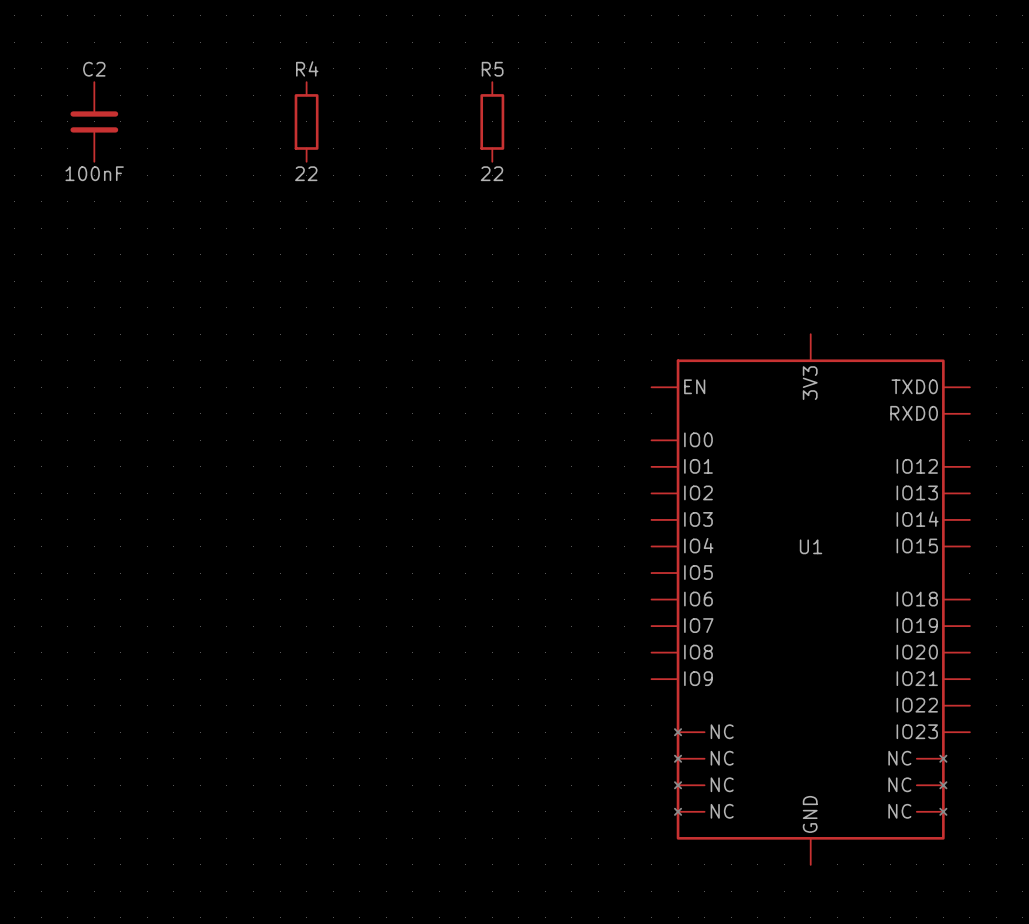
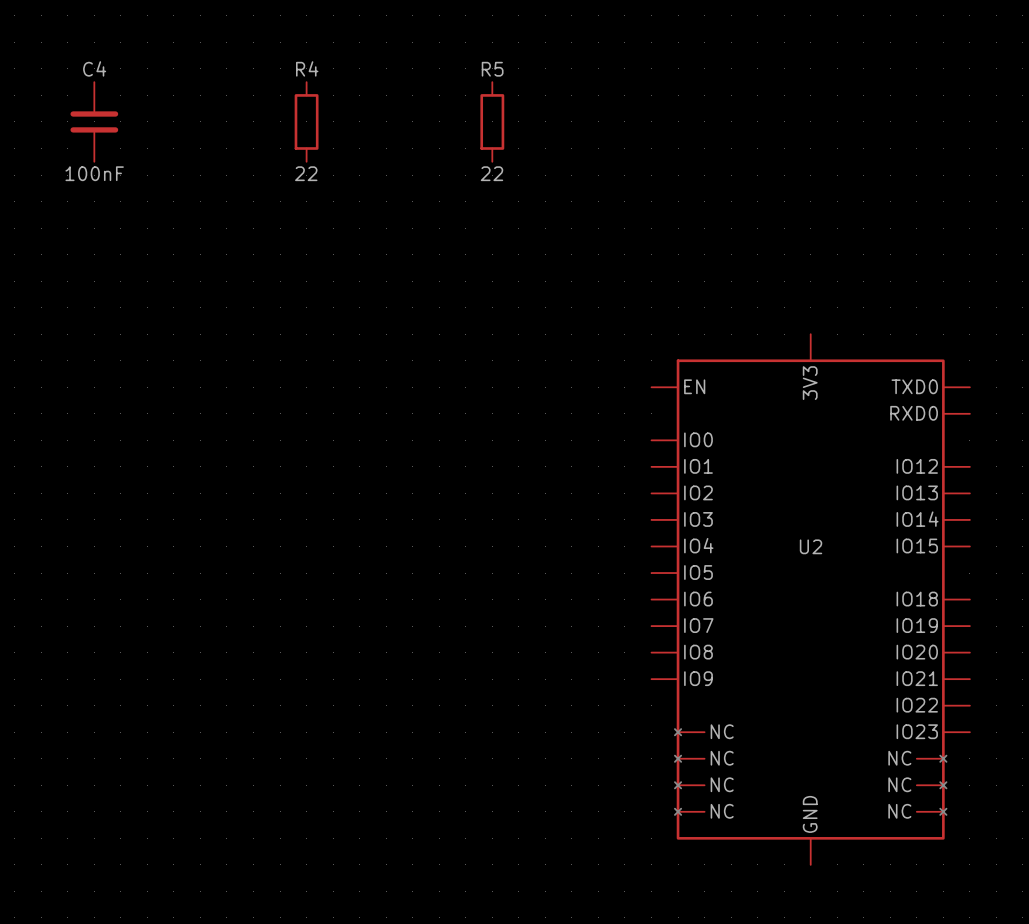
C2 name: C2 (94, 69) -> C4 (94, 68)
U1 name: U1 (811, 546) -> U2 (811, 546)

